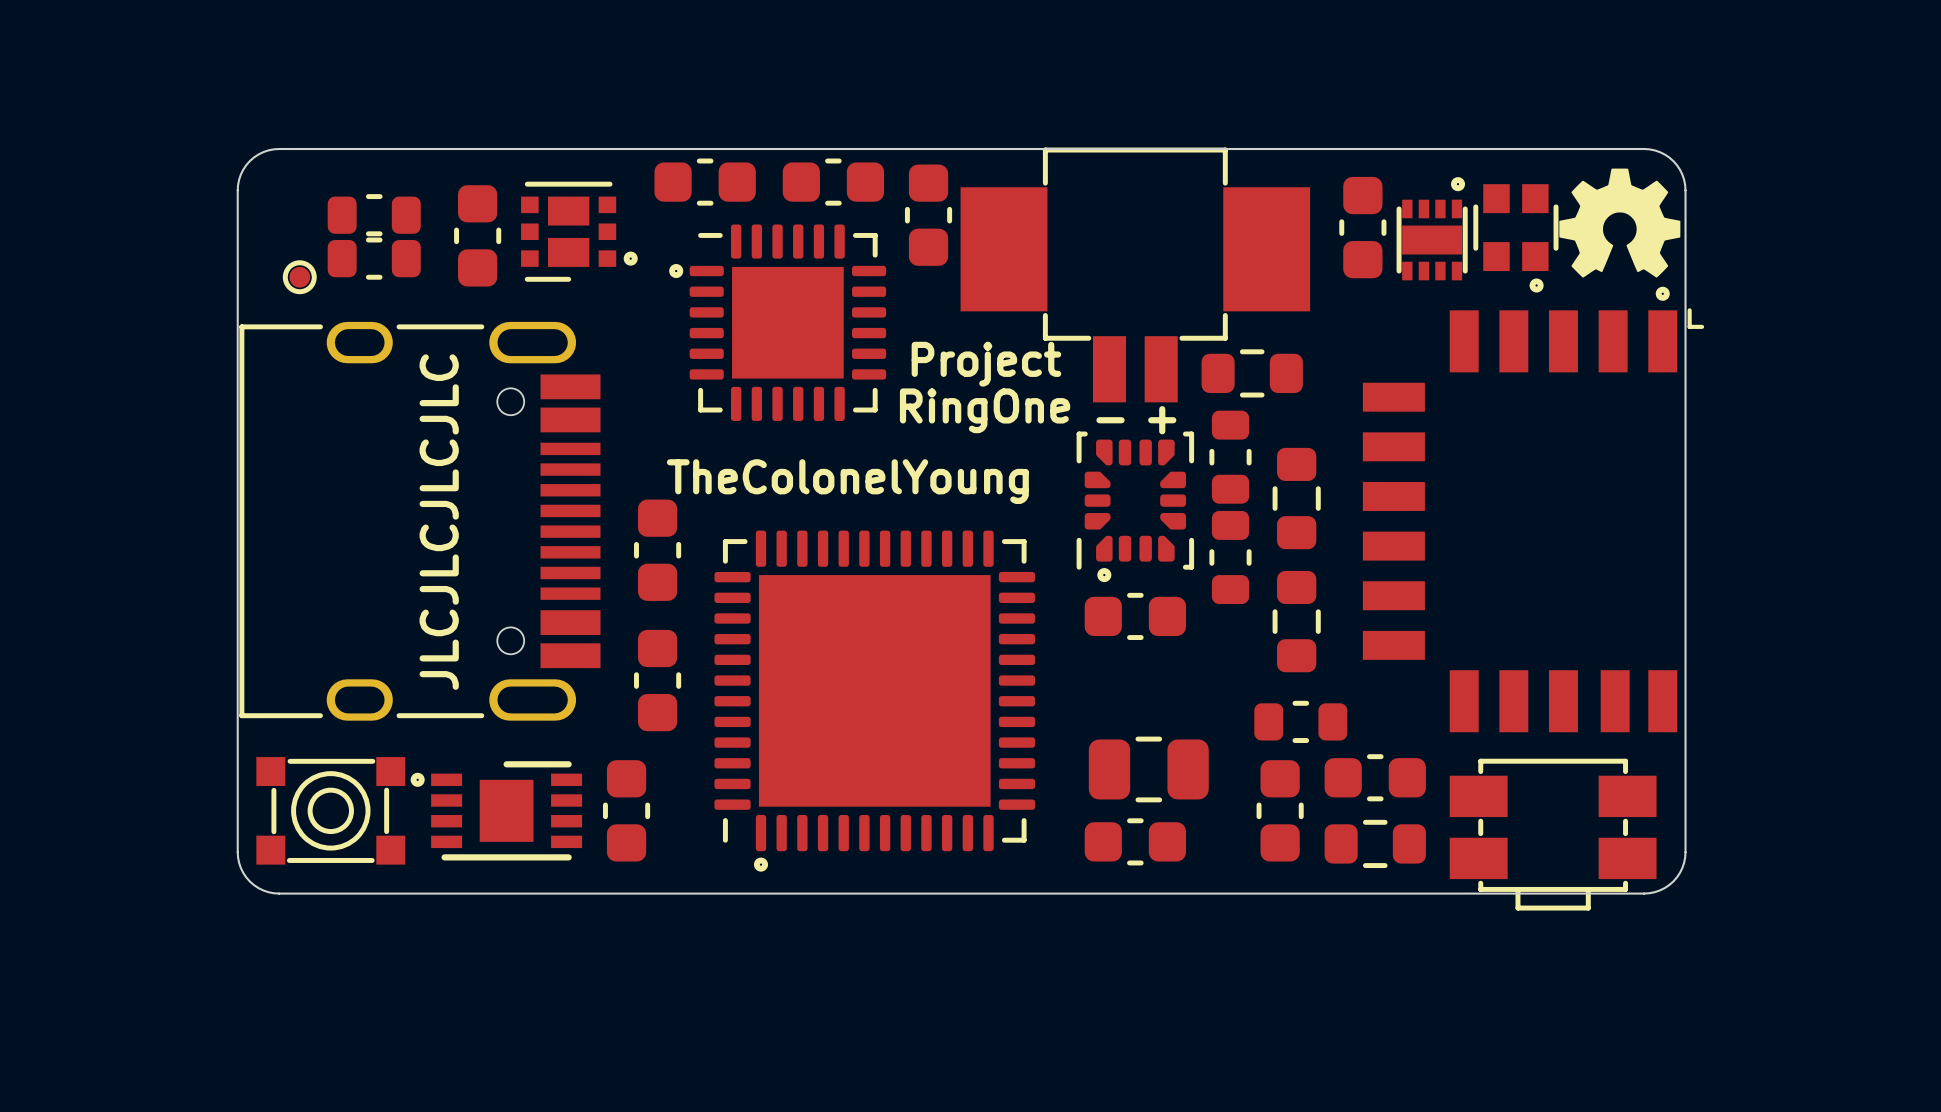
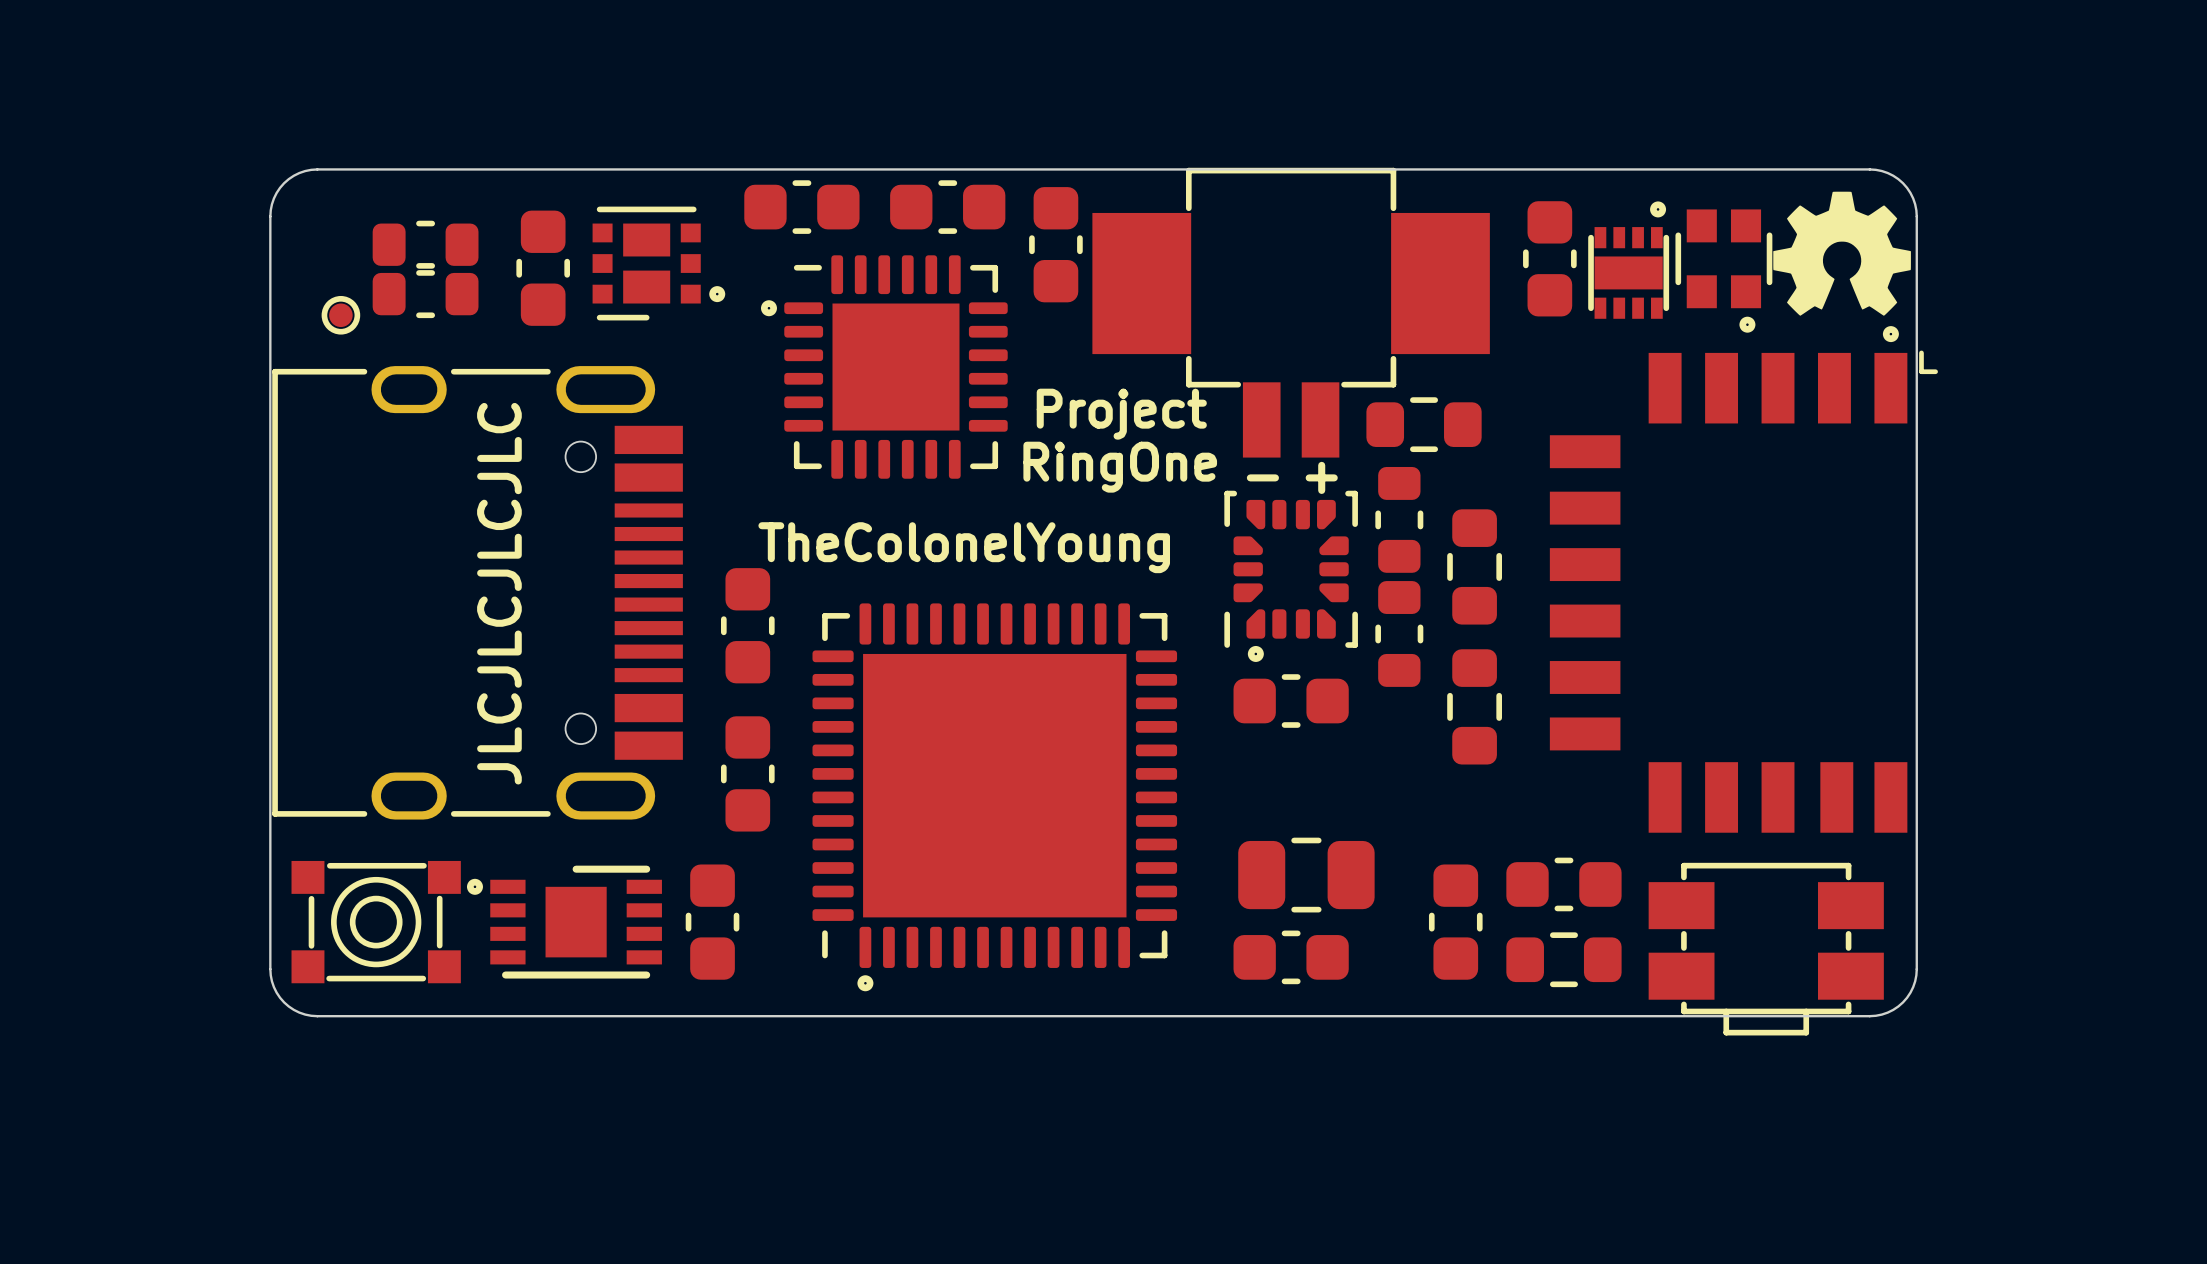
part: (1300, 721) -> none

